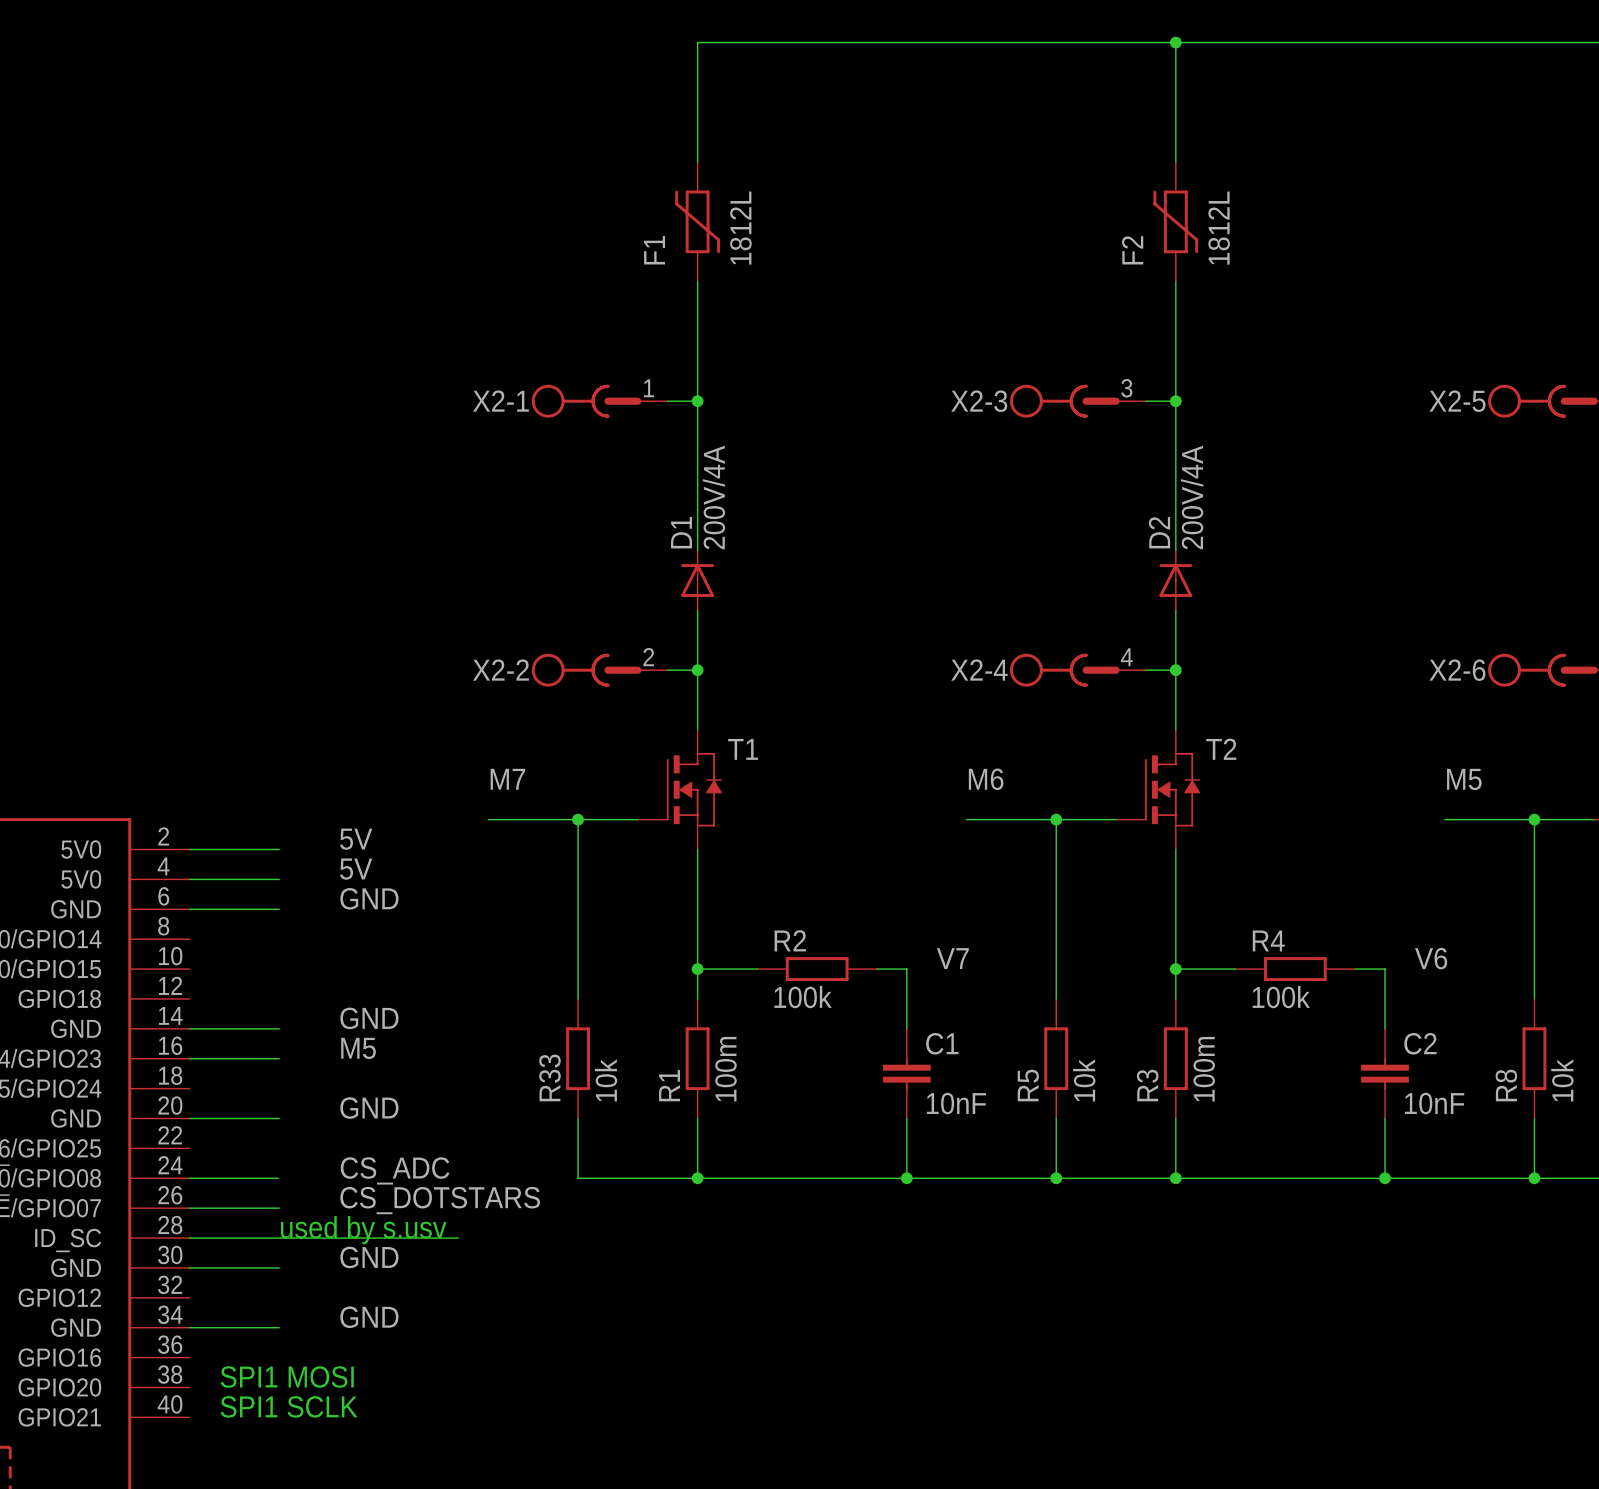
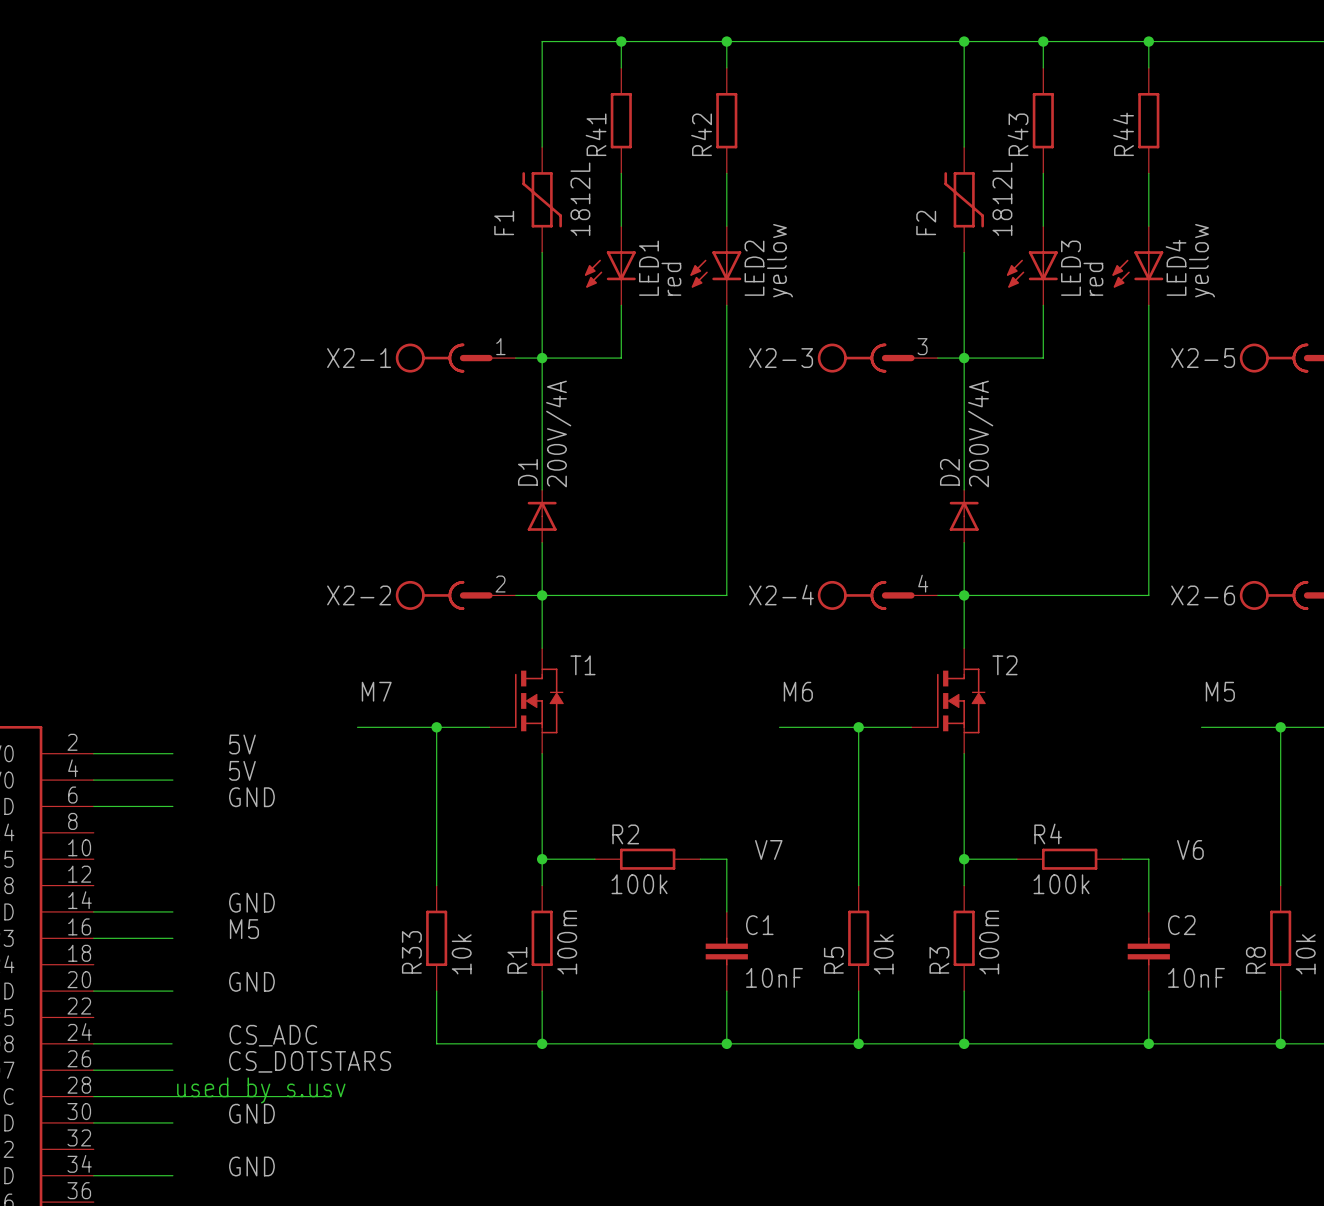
wire: none -> (621, 41) (621, 67)
junction: none -> (621, 41)
wire: none -> (726, 41) (726, 67)
junction: none -> (726, 41)
wire: none -> (1043, 41) (1043, 67)
junction: none -> (1043, 41)
wire: none -> (1148, 41) (1148, 67)
junction: none -> (1148, 41)
R41: none -> (621, 120)
R42: none -> (726, 120)
R43: none -> (1043, 120)
R44: none -> (1148, 120)
wire: none -> (621, 173) (621, 226)
wire: none -> (726, 173) (726, 226)
wire: none -> (1043, 173) (1043, 226)
wire: none -> (1148, 173) (1148, 226)
LED1: none -> red (610, 265)
LED2: none -> yellow (715, 265)
LED3: none -> red (1032, 265)
LED4: none -> yellow (1137, 265)
wire: none -> (621, 305) (621, 358) (542, 358)
wire: none -> (726, 305) (726, 595) (542, 595)
wire: none -> (1043, 305) (1043, 358) (964, 358)
wire: none -> (1148, 305) (1148, 595) (964, 595)

